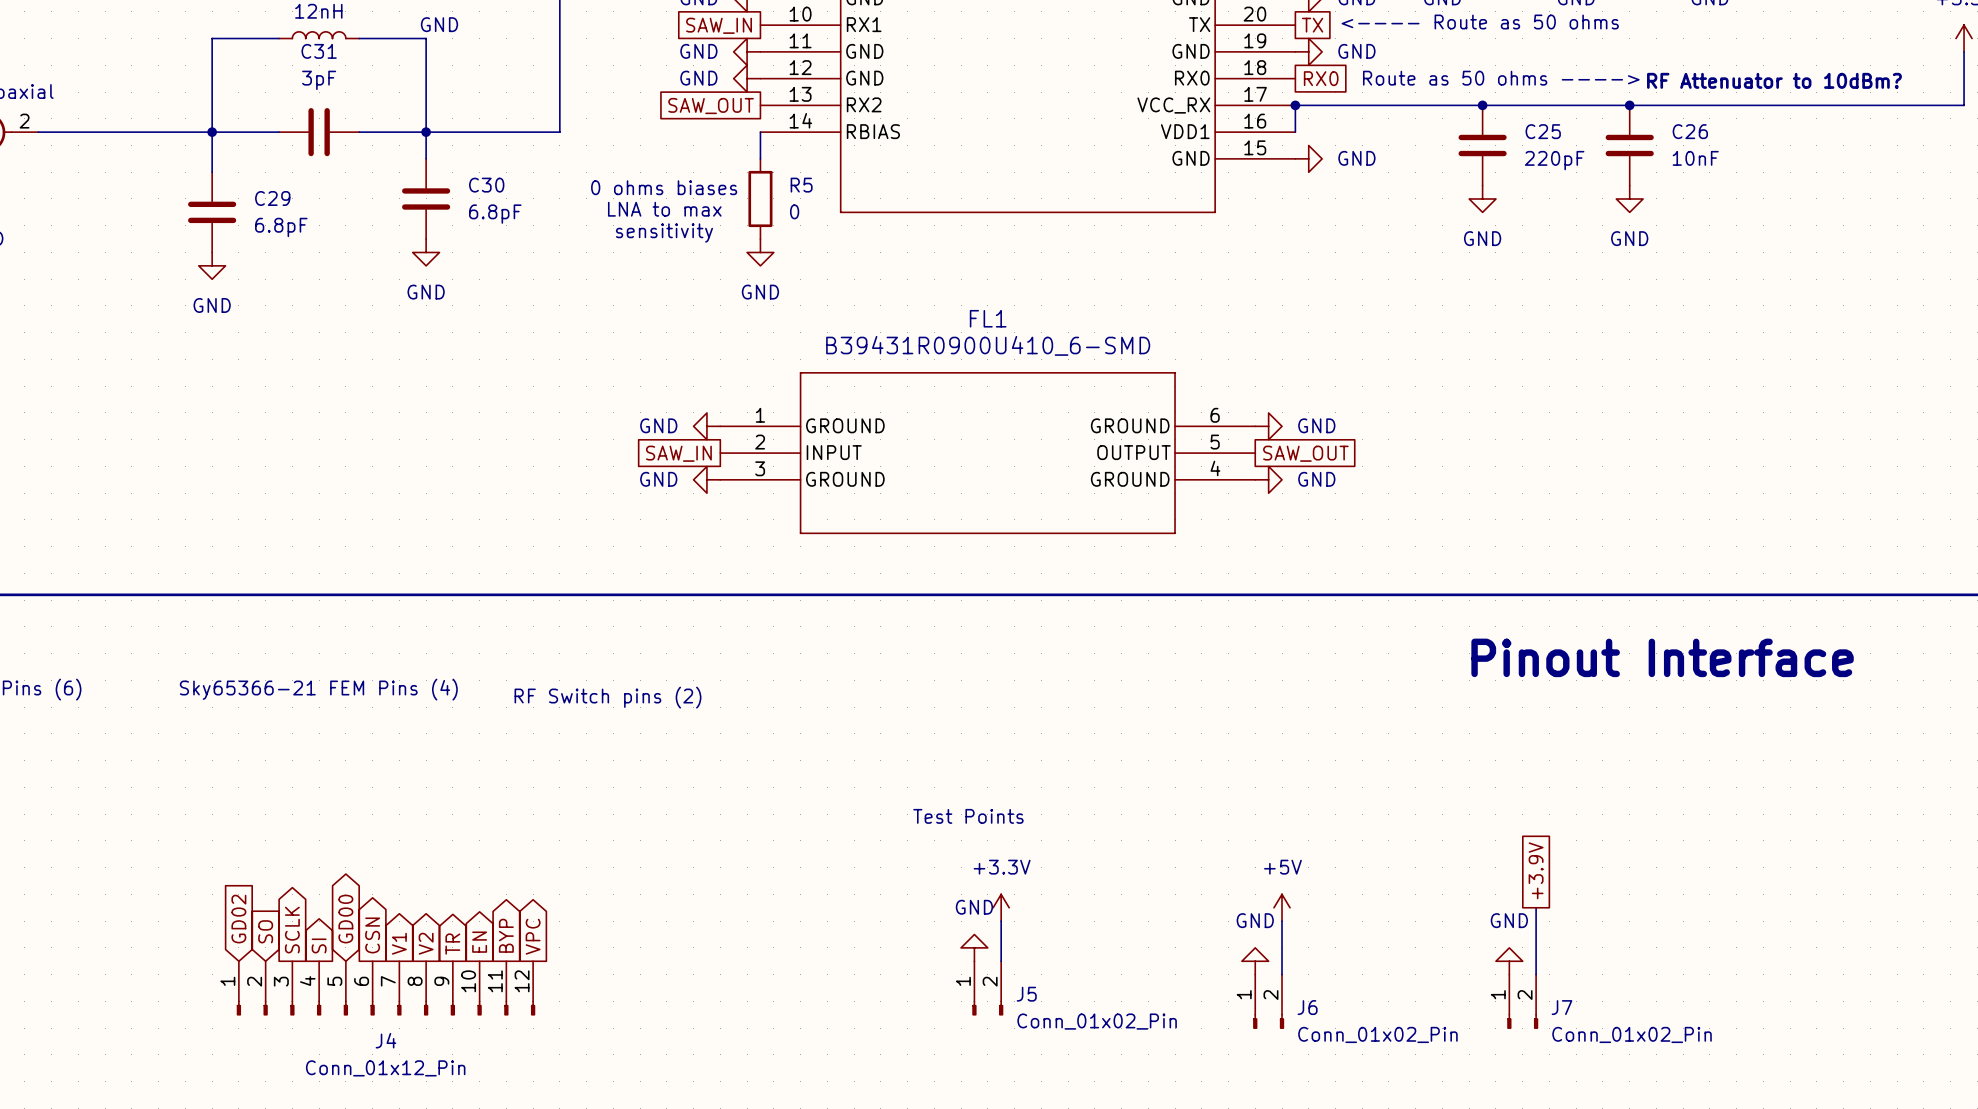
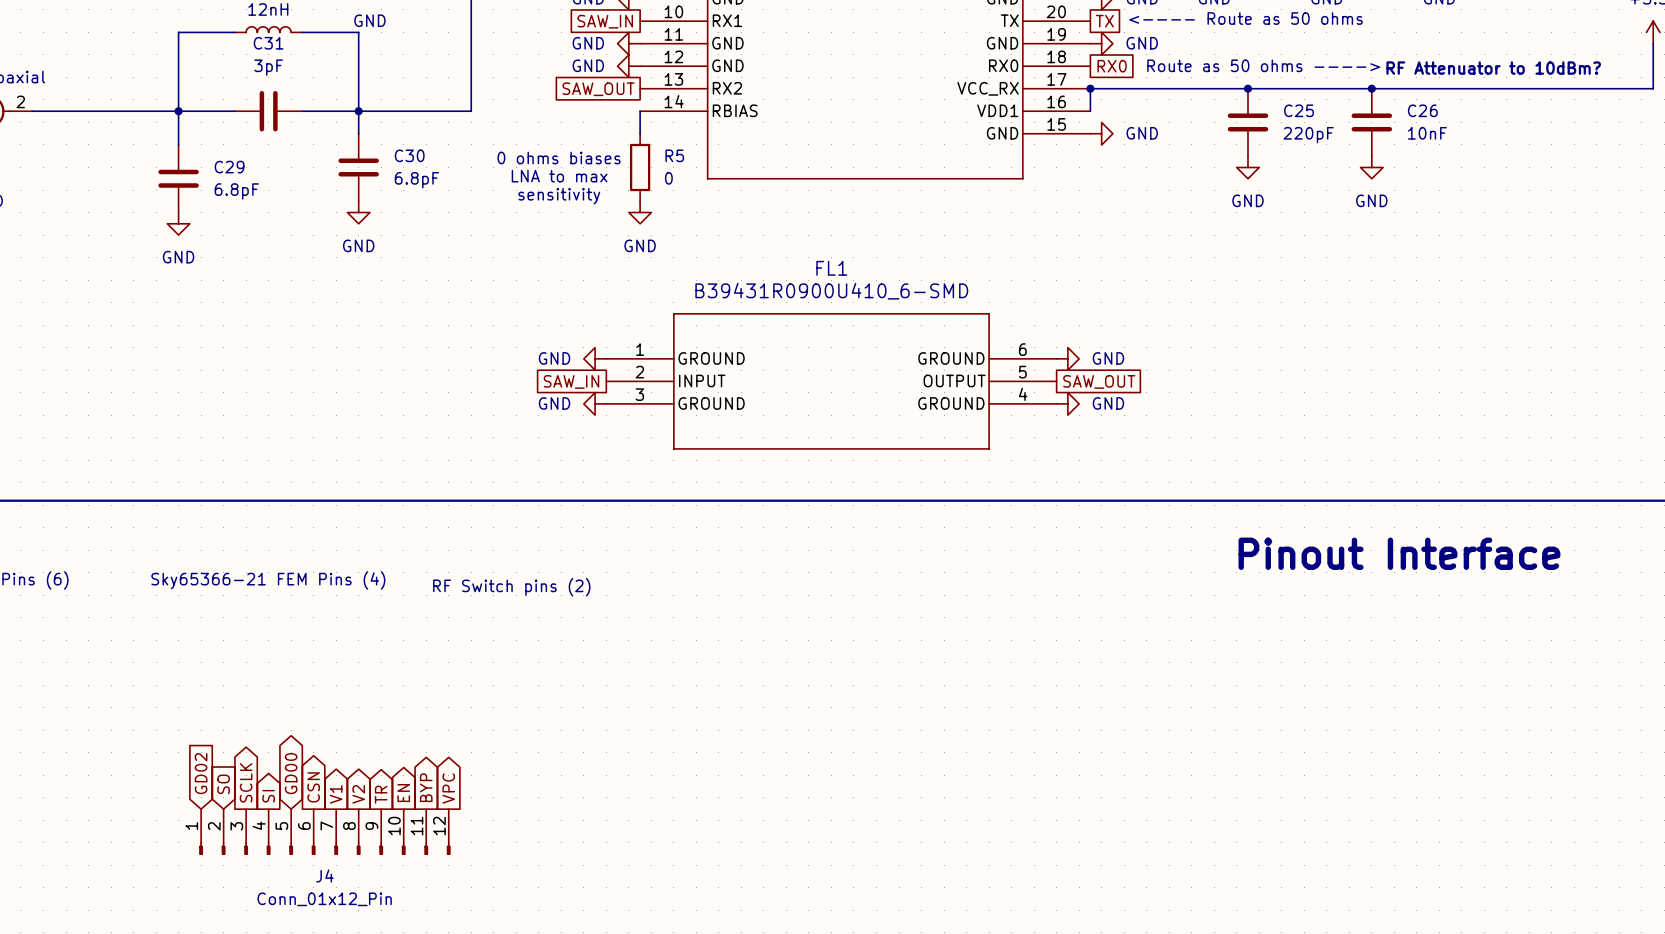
text: Test Points (968, 816) -> none
global label: +3.9V (1536, 870) -> none
power symbol: +3.3V (1001, 907) -> none
power symbol: +5V (1282, 907) -> none
wire: (1536, 907) (1536, 974) -> none
wire: (1001, 921) (1001, 961) -> none
wire: (1282, 921) (1282, 974) -> none
power symbol: GND (974, 947) -> none
power symbol: GND (1255, 961) -> none
power symbol: GND (1509, 961) -> none
J5: Conn_01x02_Pin (987, 988) -> none
J6: Conn_01x02_Pin (1268, 1001) -> none
J7: Conn_01x02_Pin (1522, 1001) -> none

